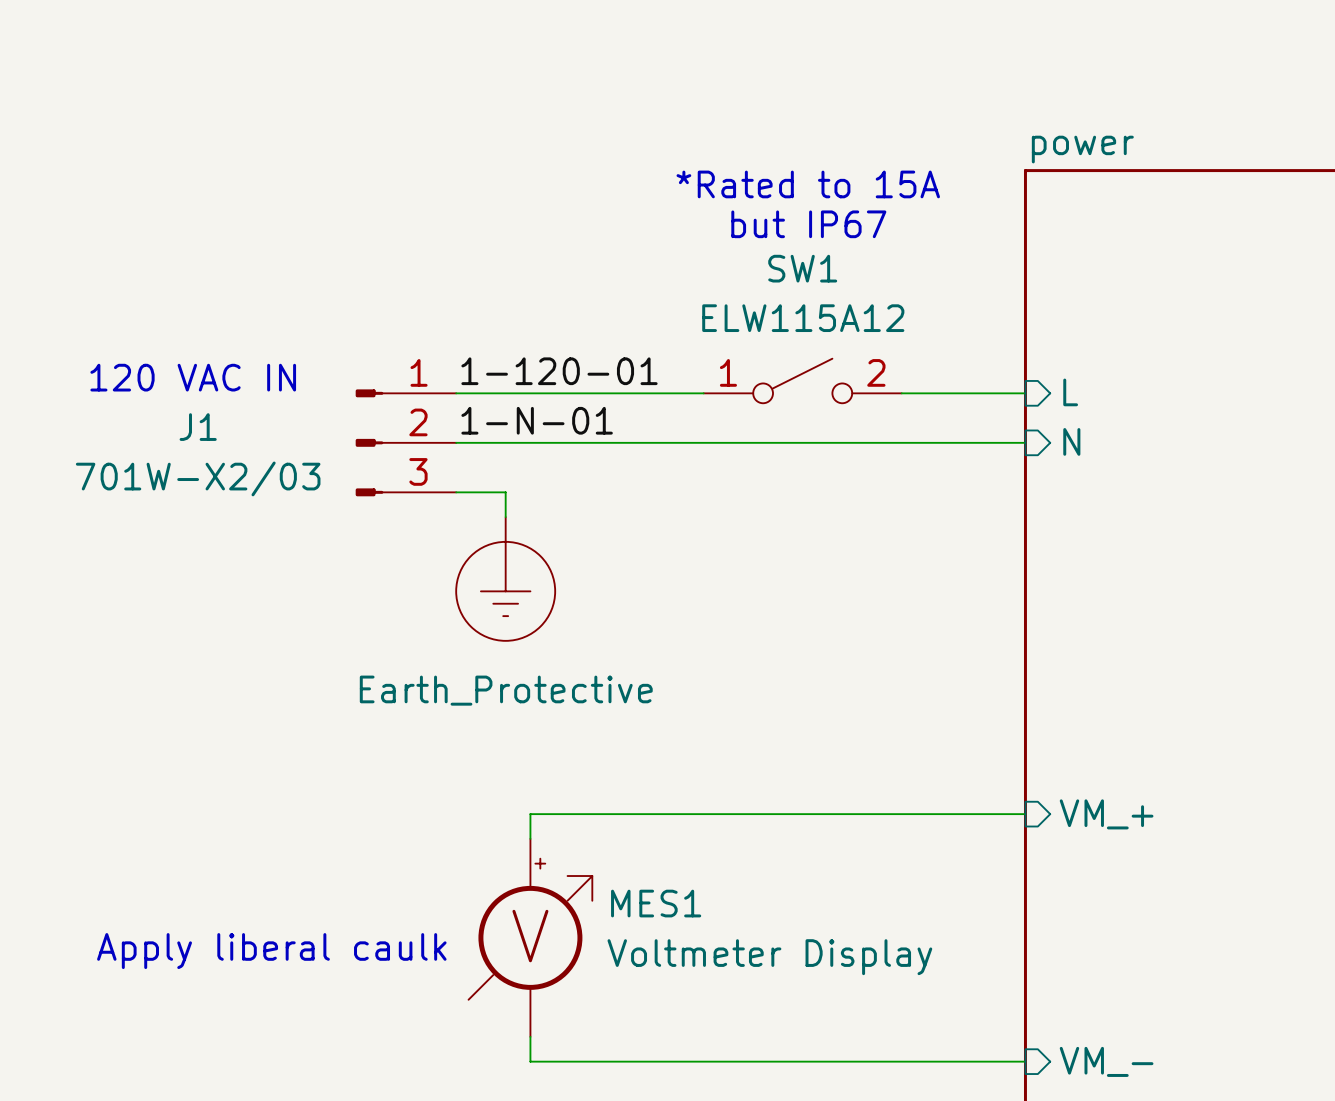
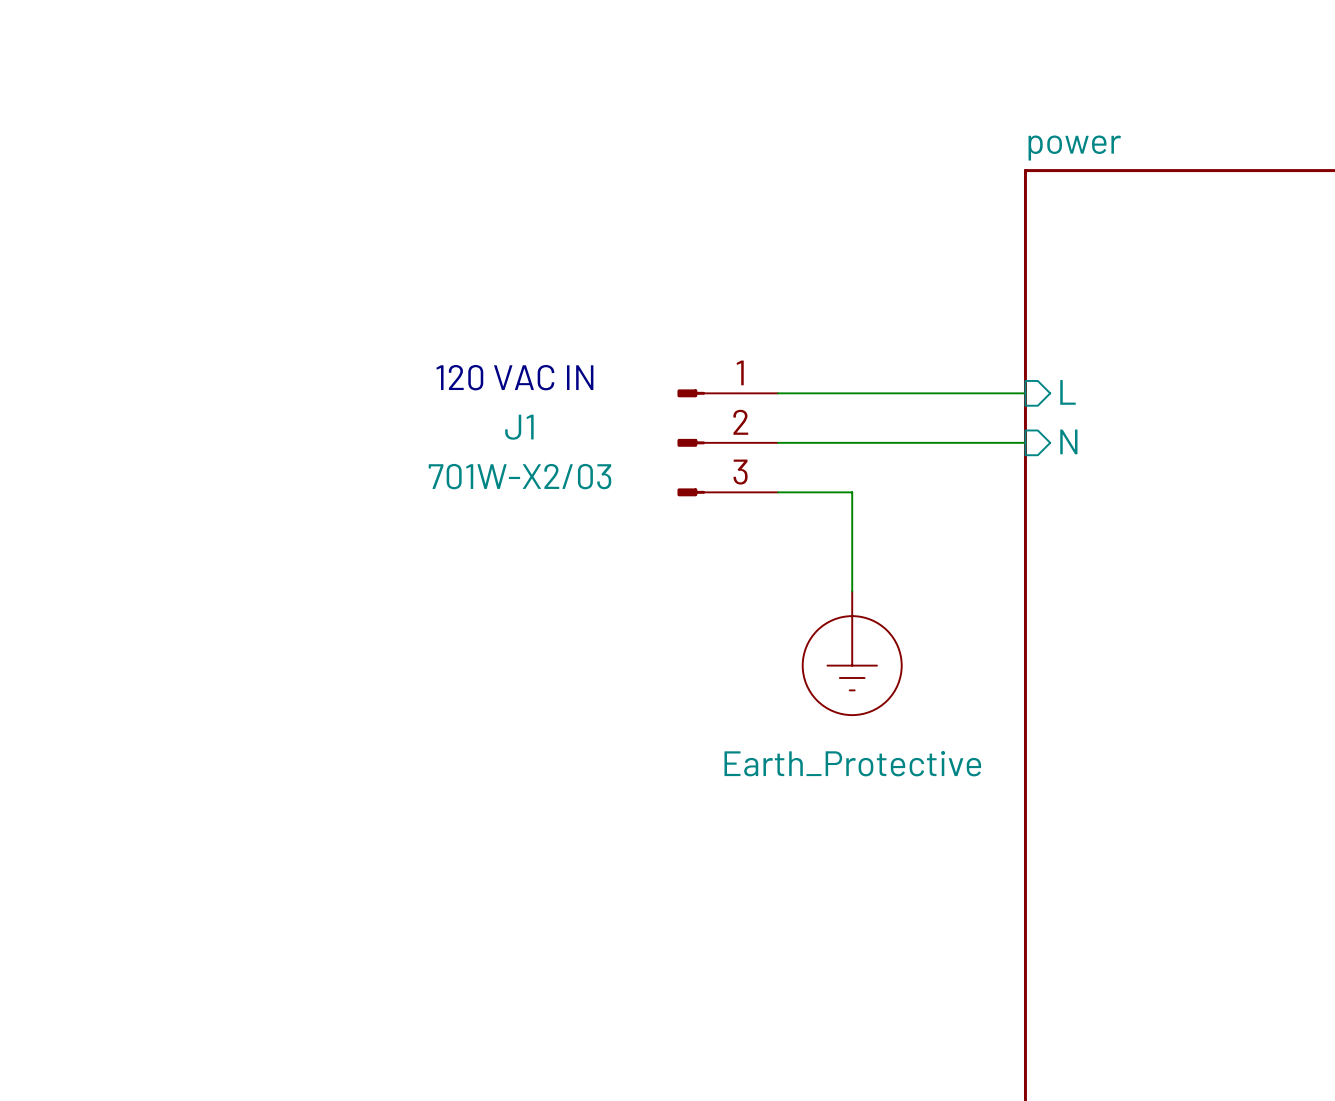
text: *Rated to 15A (808, 184) -> none
text: but IP67 (808, 224) -> none
label: 1-120-01 (559, 371) -> none
text position: 120 VAC IN (193, 377) -> 120 VAC IN (514, 377)
SW1: ELW115A12 (802, 380) -> none
wire: (456, 393) (703, 393) -> none
wire: none -> (777, 393) (901, 393)
label: 1-N-01 (537, 420) -> none
J1 position: (405, 442) -> (727, 442)
wire: (456, 442) (777, 442) -> none
wire: (456, 492) (505, 492) (505, 517) -> none
wire: none -> (777, 492) (852, 492) (852, 591)
power symbol position: Earth_Protective (505, 578) -> Earth_Protective (852, 653)
wire: (1025, 814) (530, 814) (530, 838) -> none
sheet pin: VM_+ (1106, 814) -> none
MES1: Voltmeter Display (530, 937) -> none
text: Apply liberal caulk (271, 951) -> none
wire: (530, 1036) (530, 1061) (1025, 1061) -> none
sheet pin: VM_- (1106, 1061) -> none

